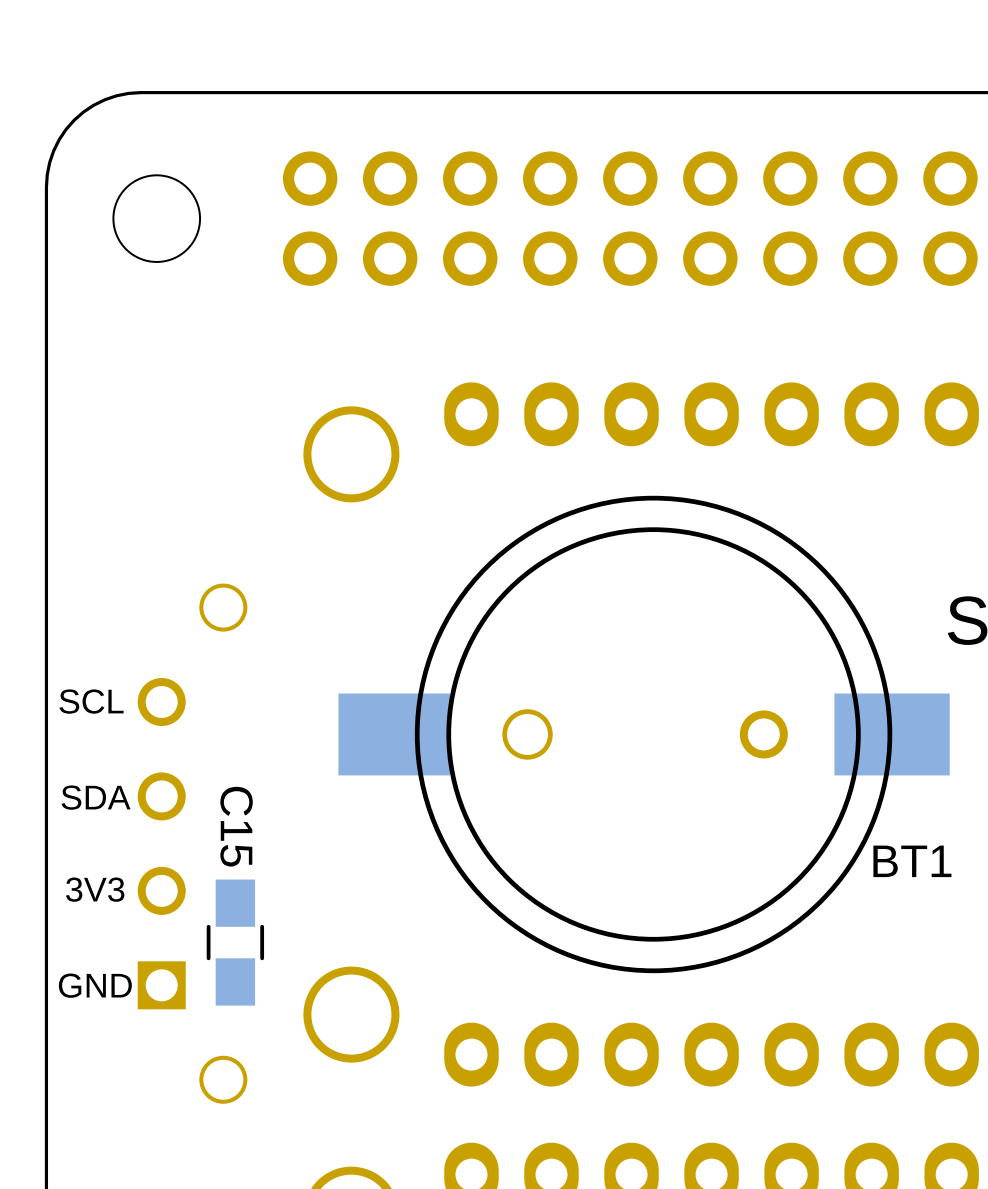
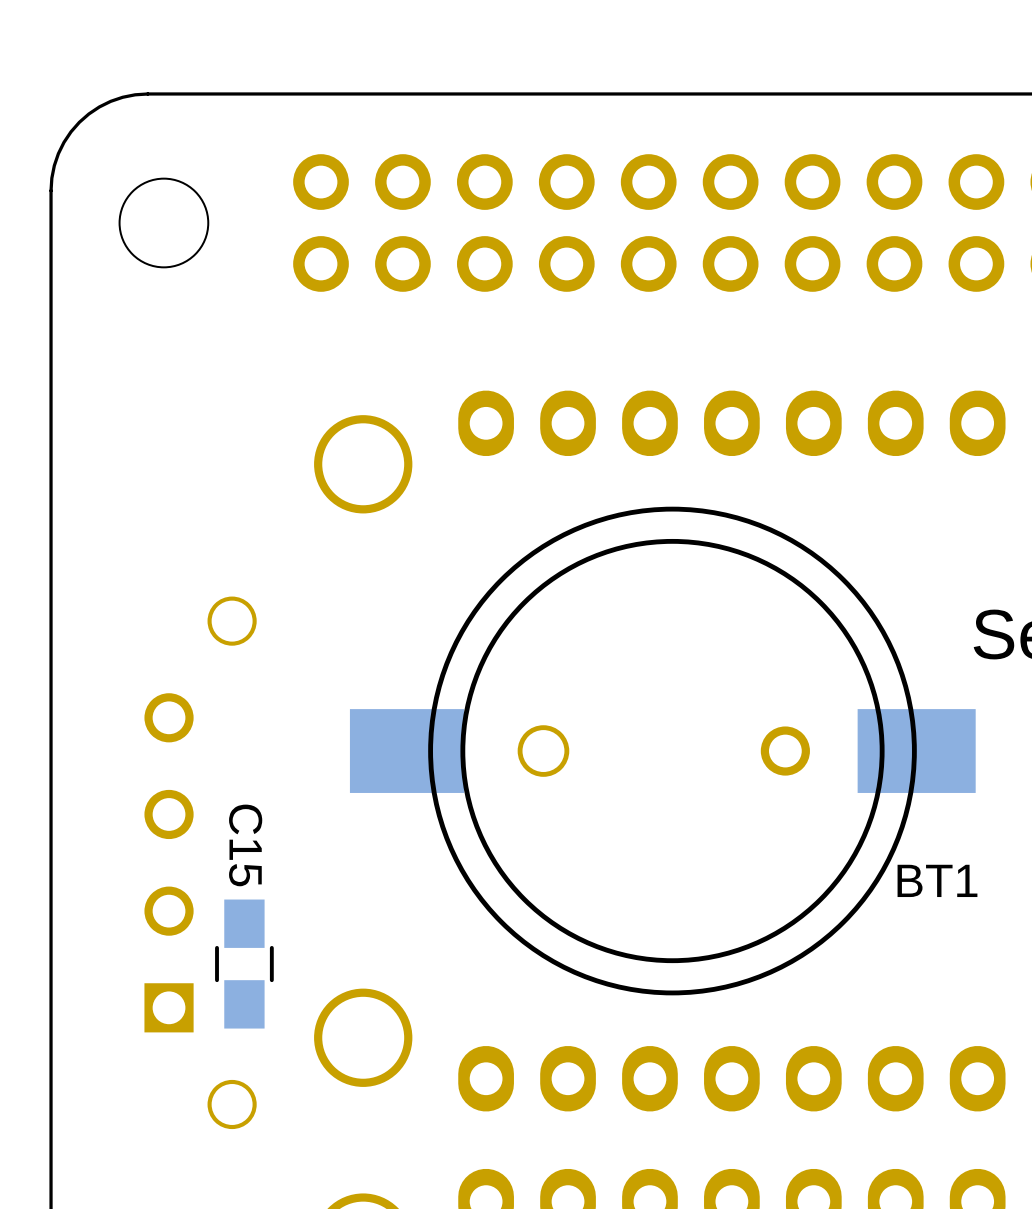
text: SCL (91, 701) -> none
text: SDA (96, 797) -> none
text: 3V3 (95, 889) -> none
text: GND (95, 985) -> none

